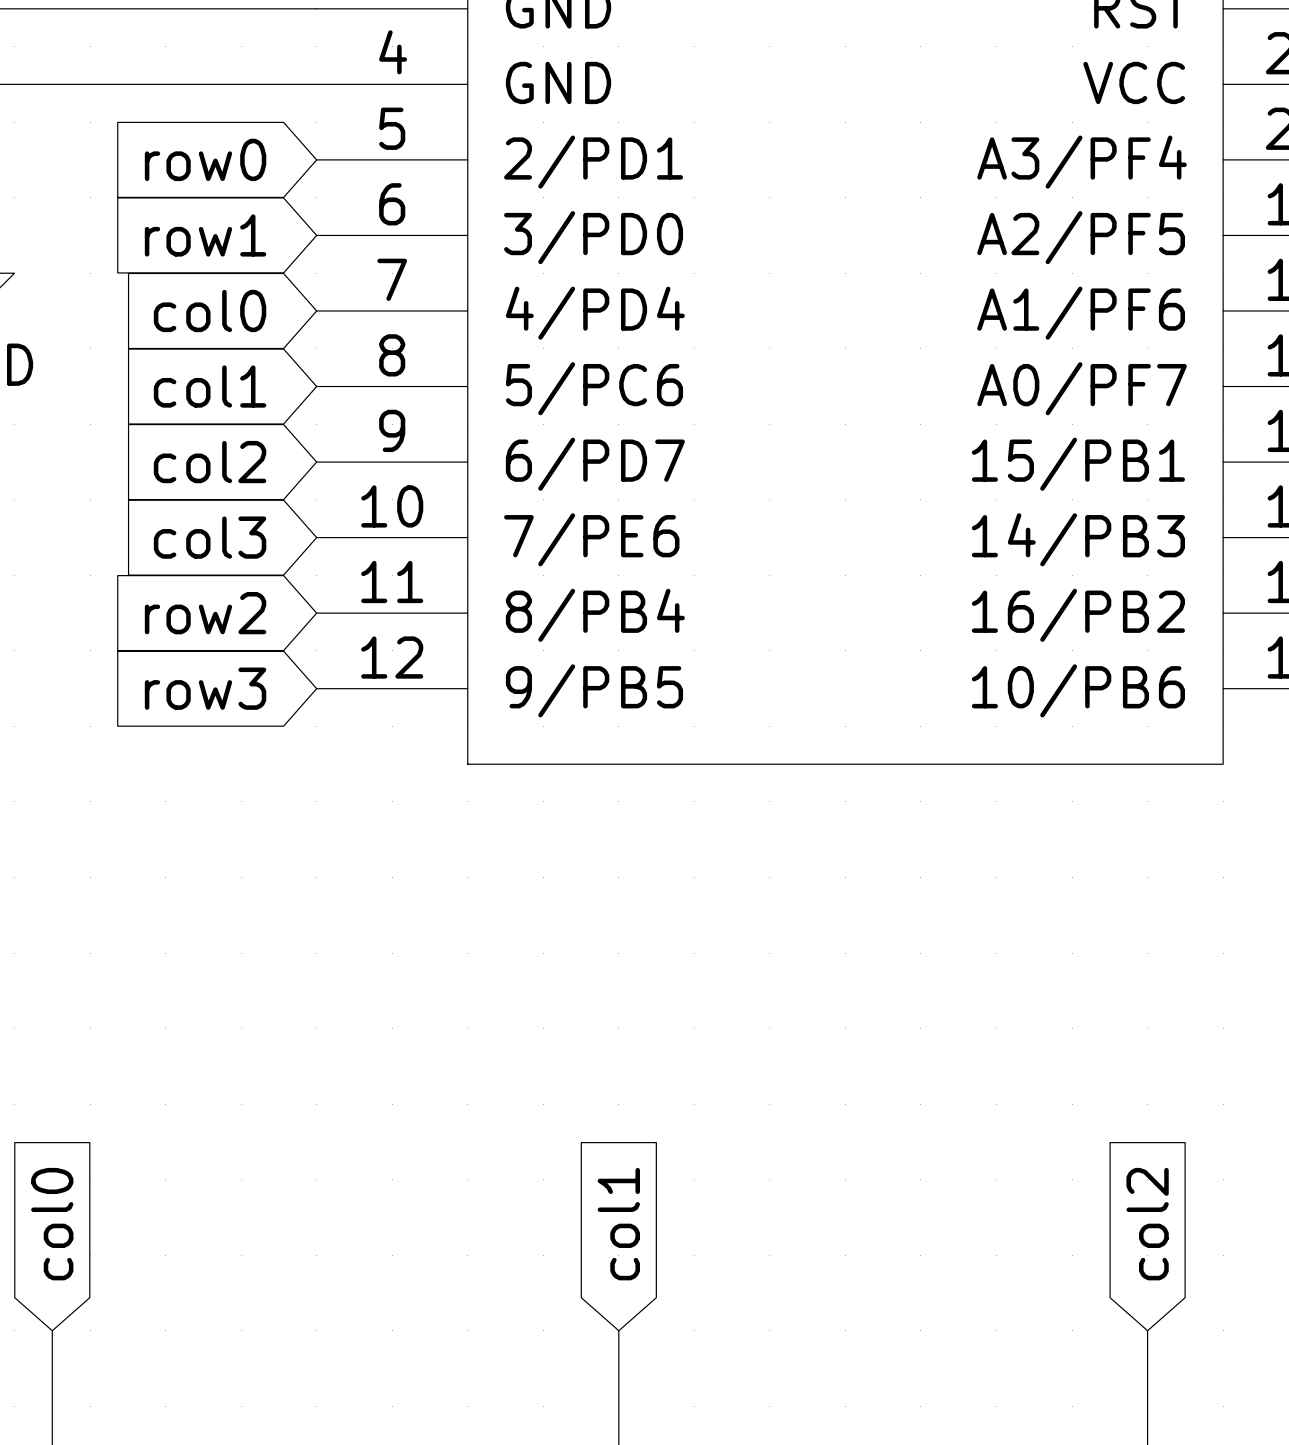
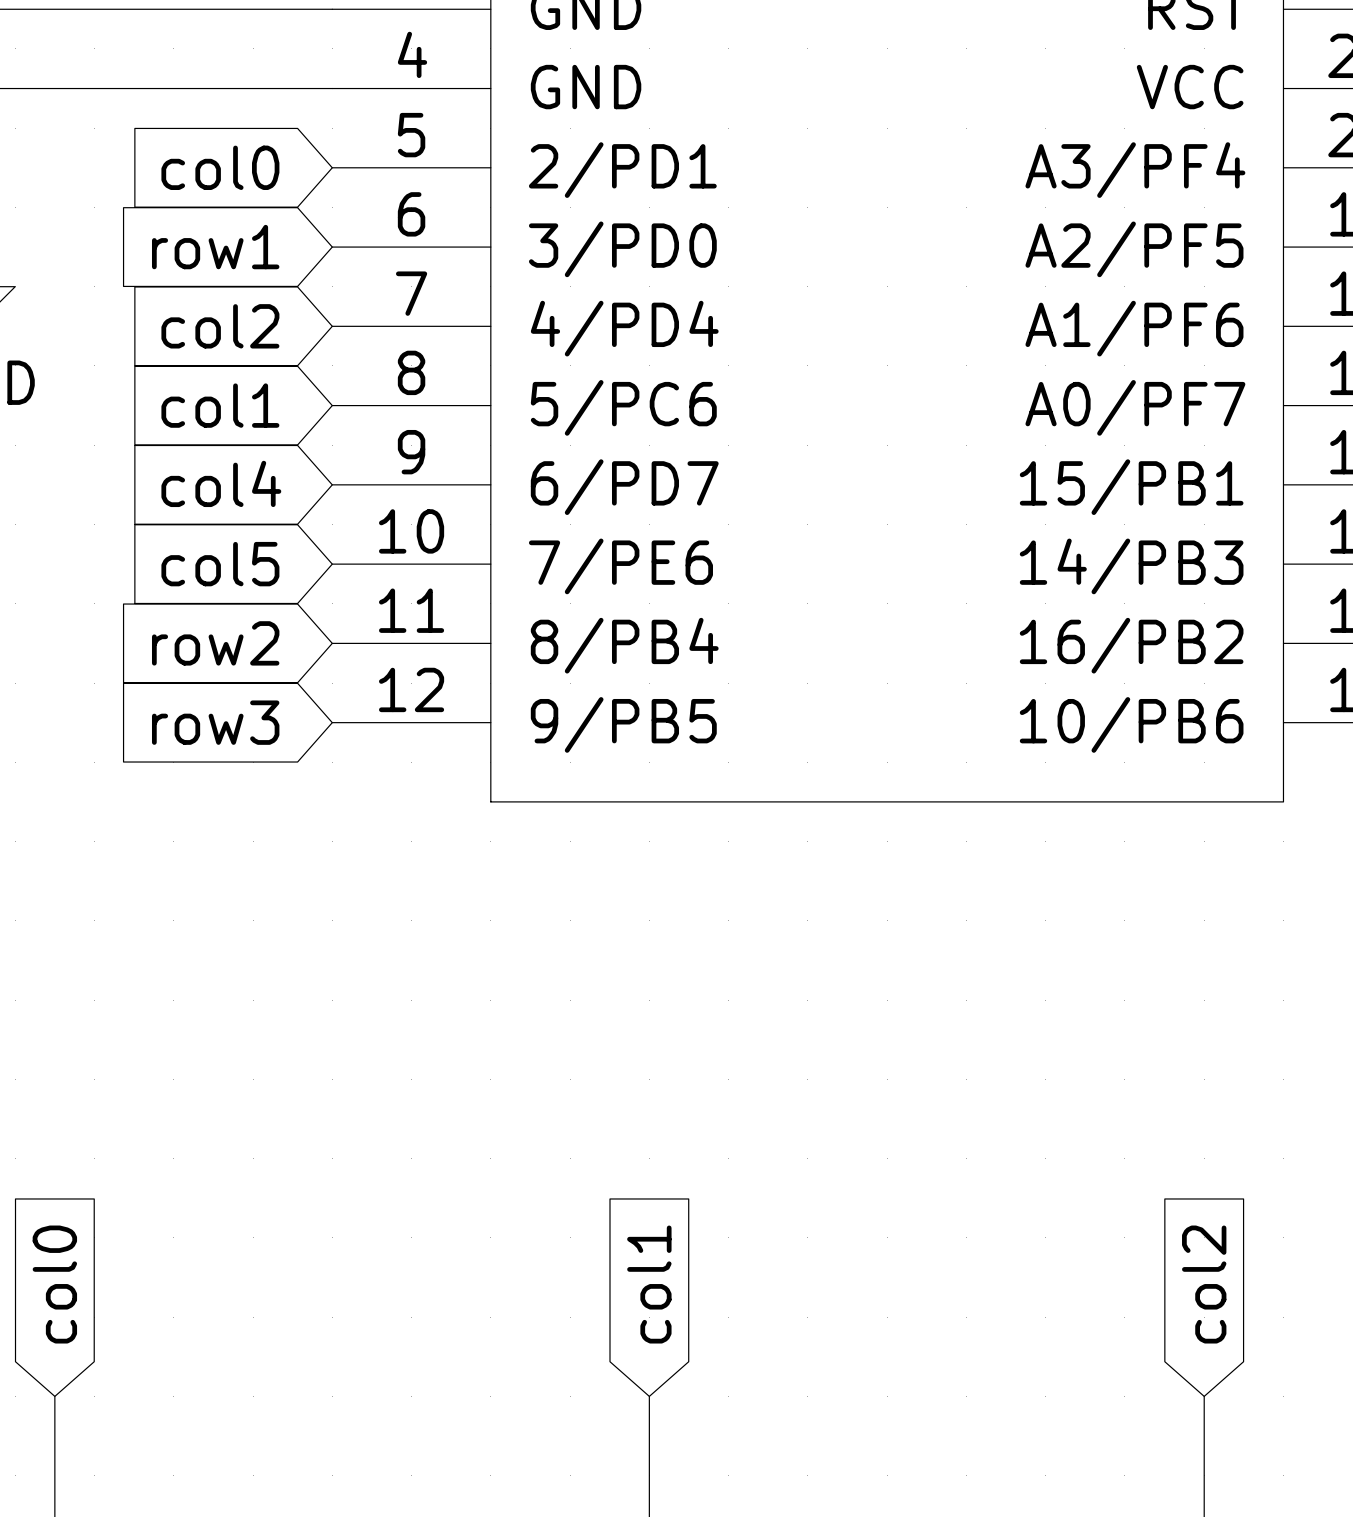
global label: row0 (205, 159) -> col0 (220, 167)
global label: col0 (210, 310) -> col2 (220, 326)
global label: col2 (210, 462) -> col4 (221, 483)
global label: col3 (210, 537) -> col5 (220, 564)

